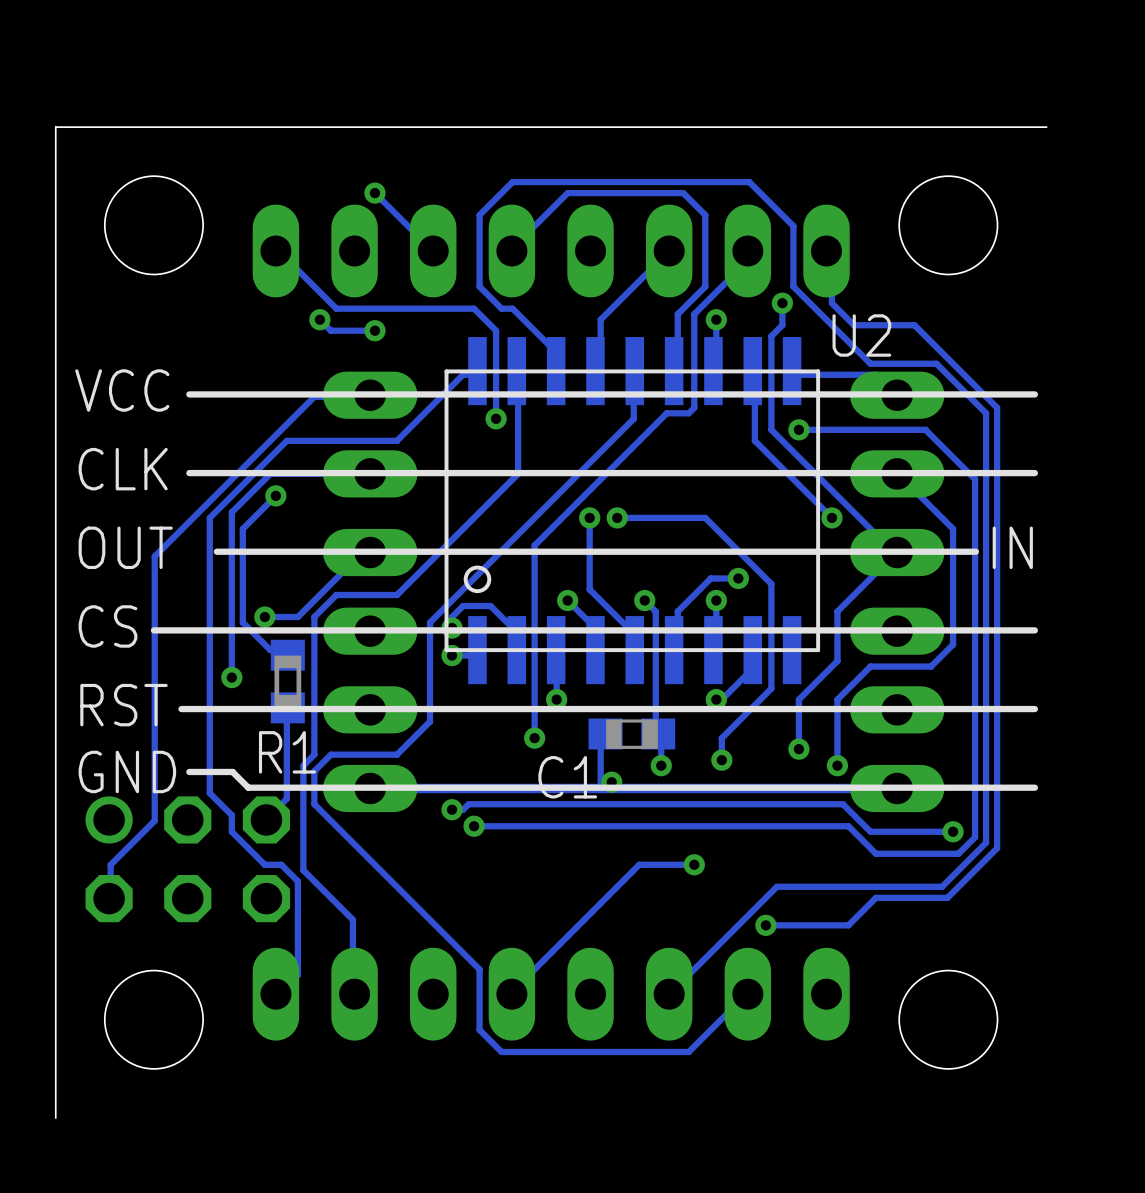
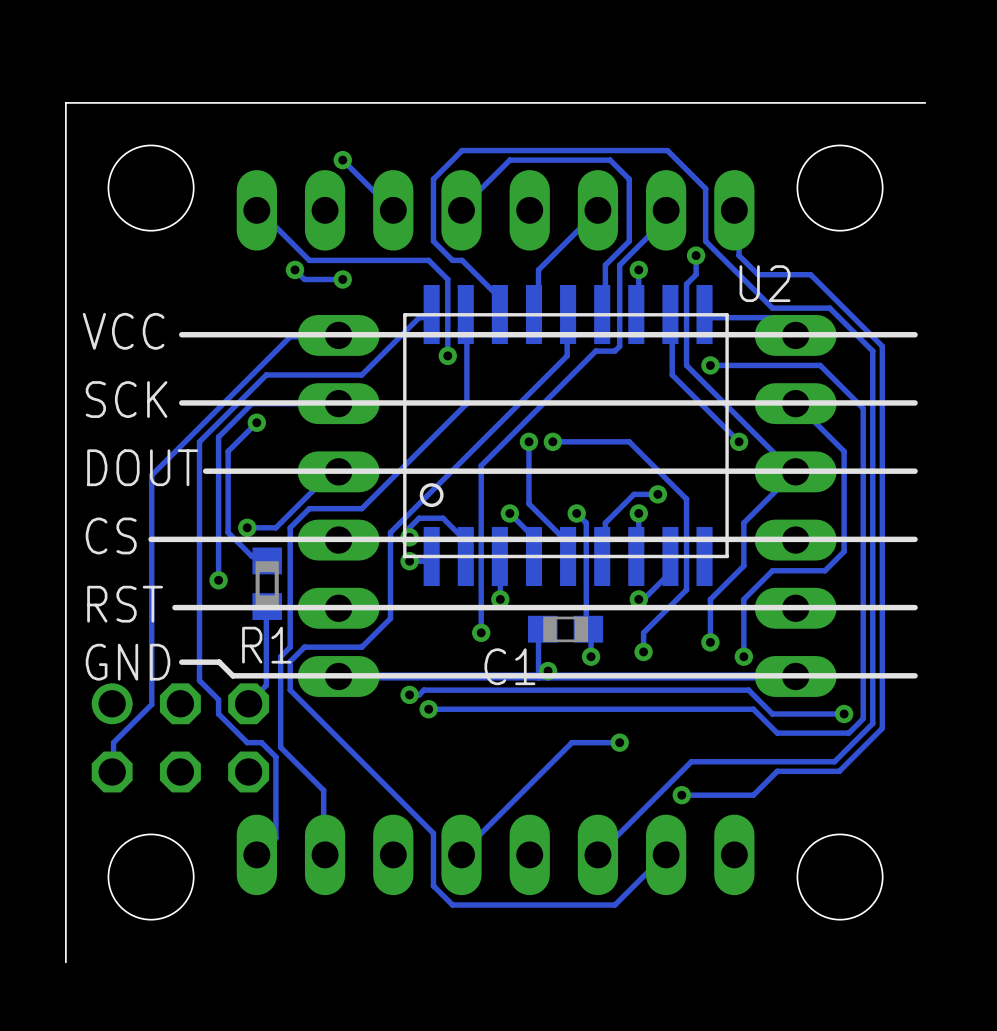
text: CLK (123, 469) -> SCK (126, 399)
text: OUT (125, 547) -> DOUT (142, 467)
text: IN (1012, 547) -> none
line: none -> (915, 471) (863, 471)

